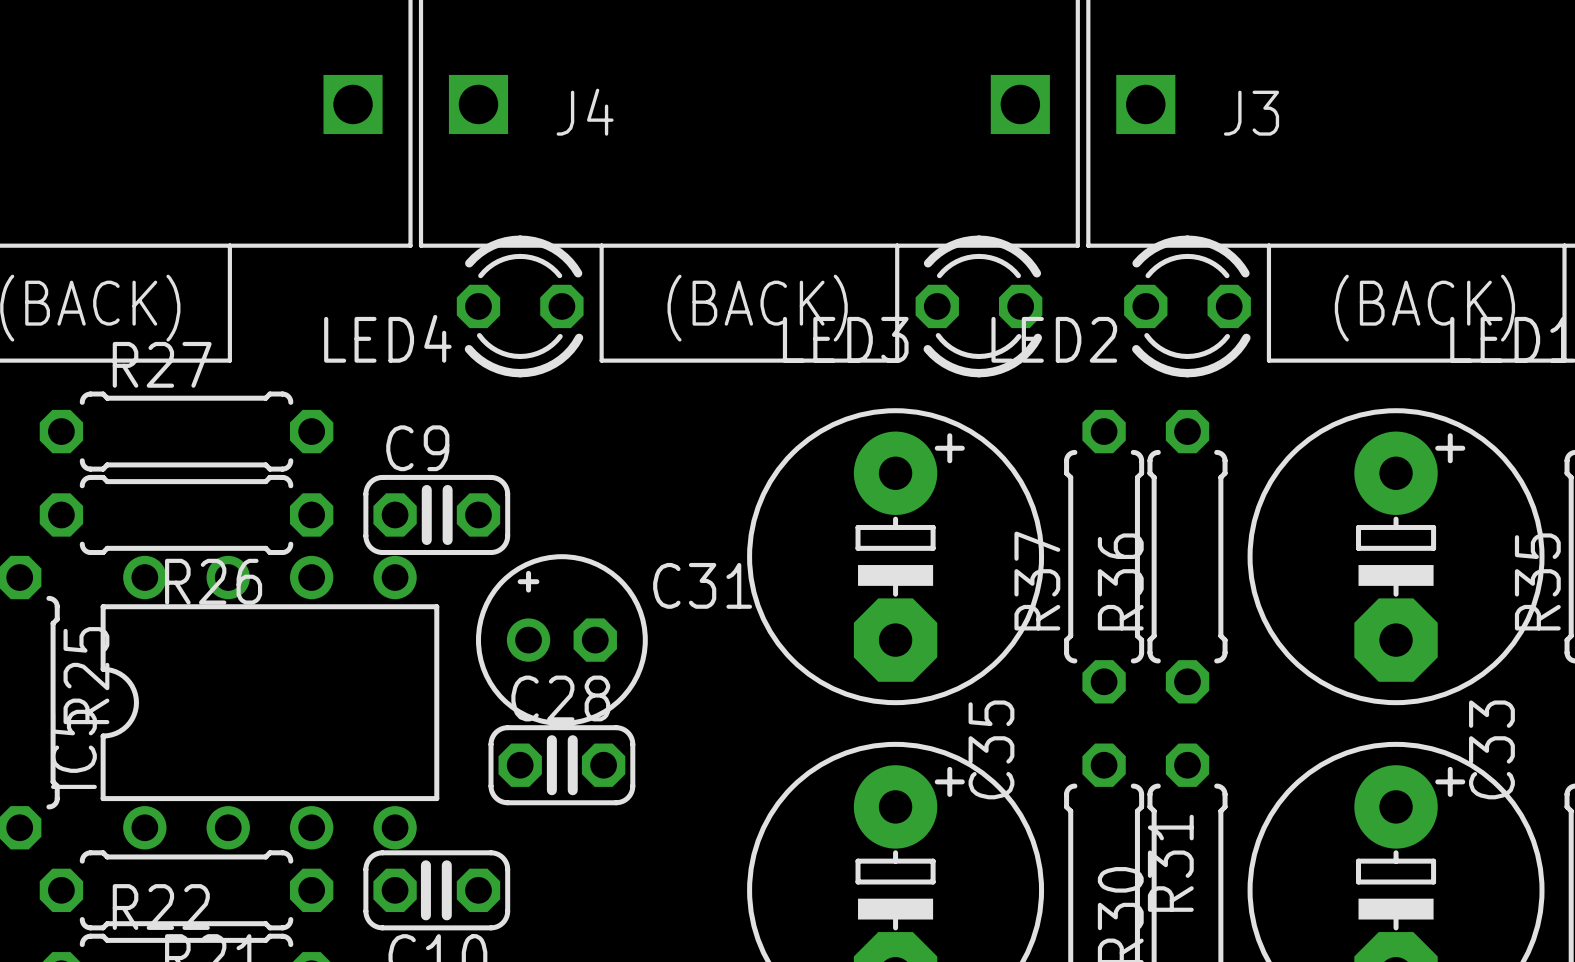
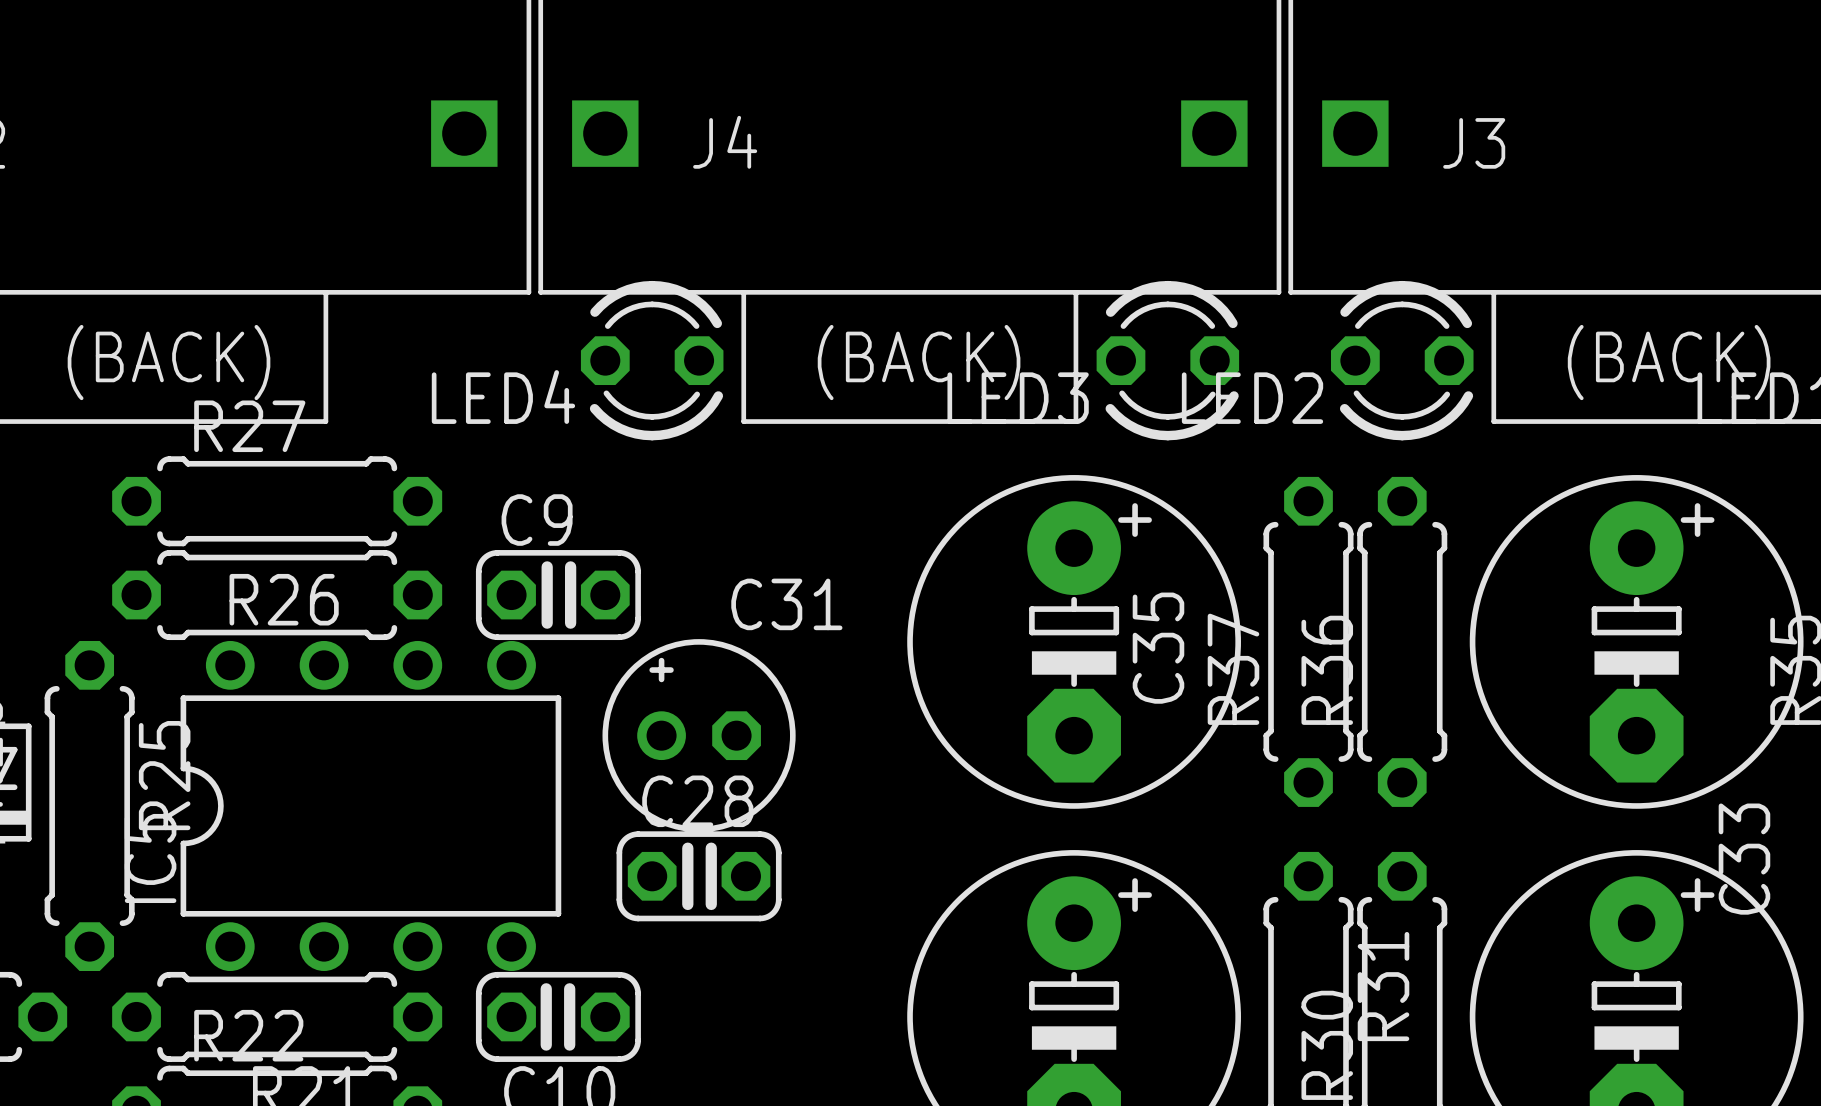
R26 name position: R26 (213, 581) -> R26 (284, 599)
C31 name position: C31 (702, 585) -> C31 (786, 604)
C35 name position: C35 (991, 749) -> C35 (1158, 648)

